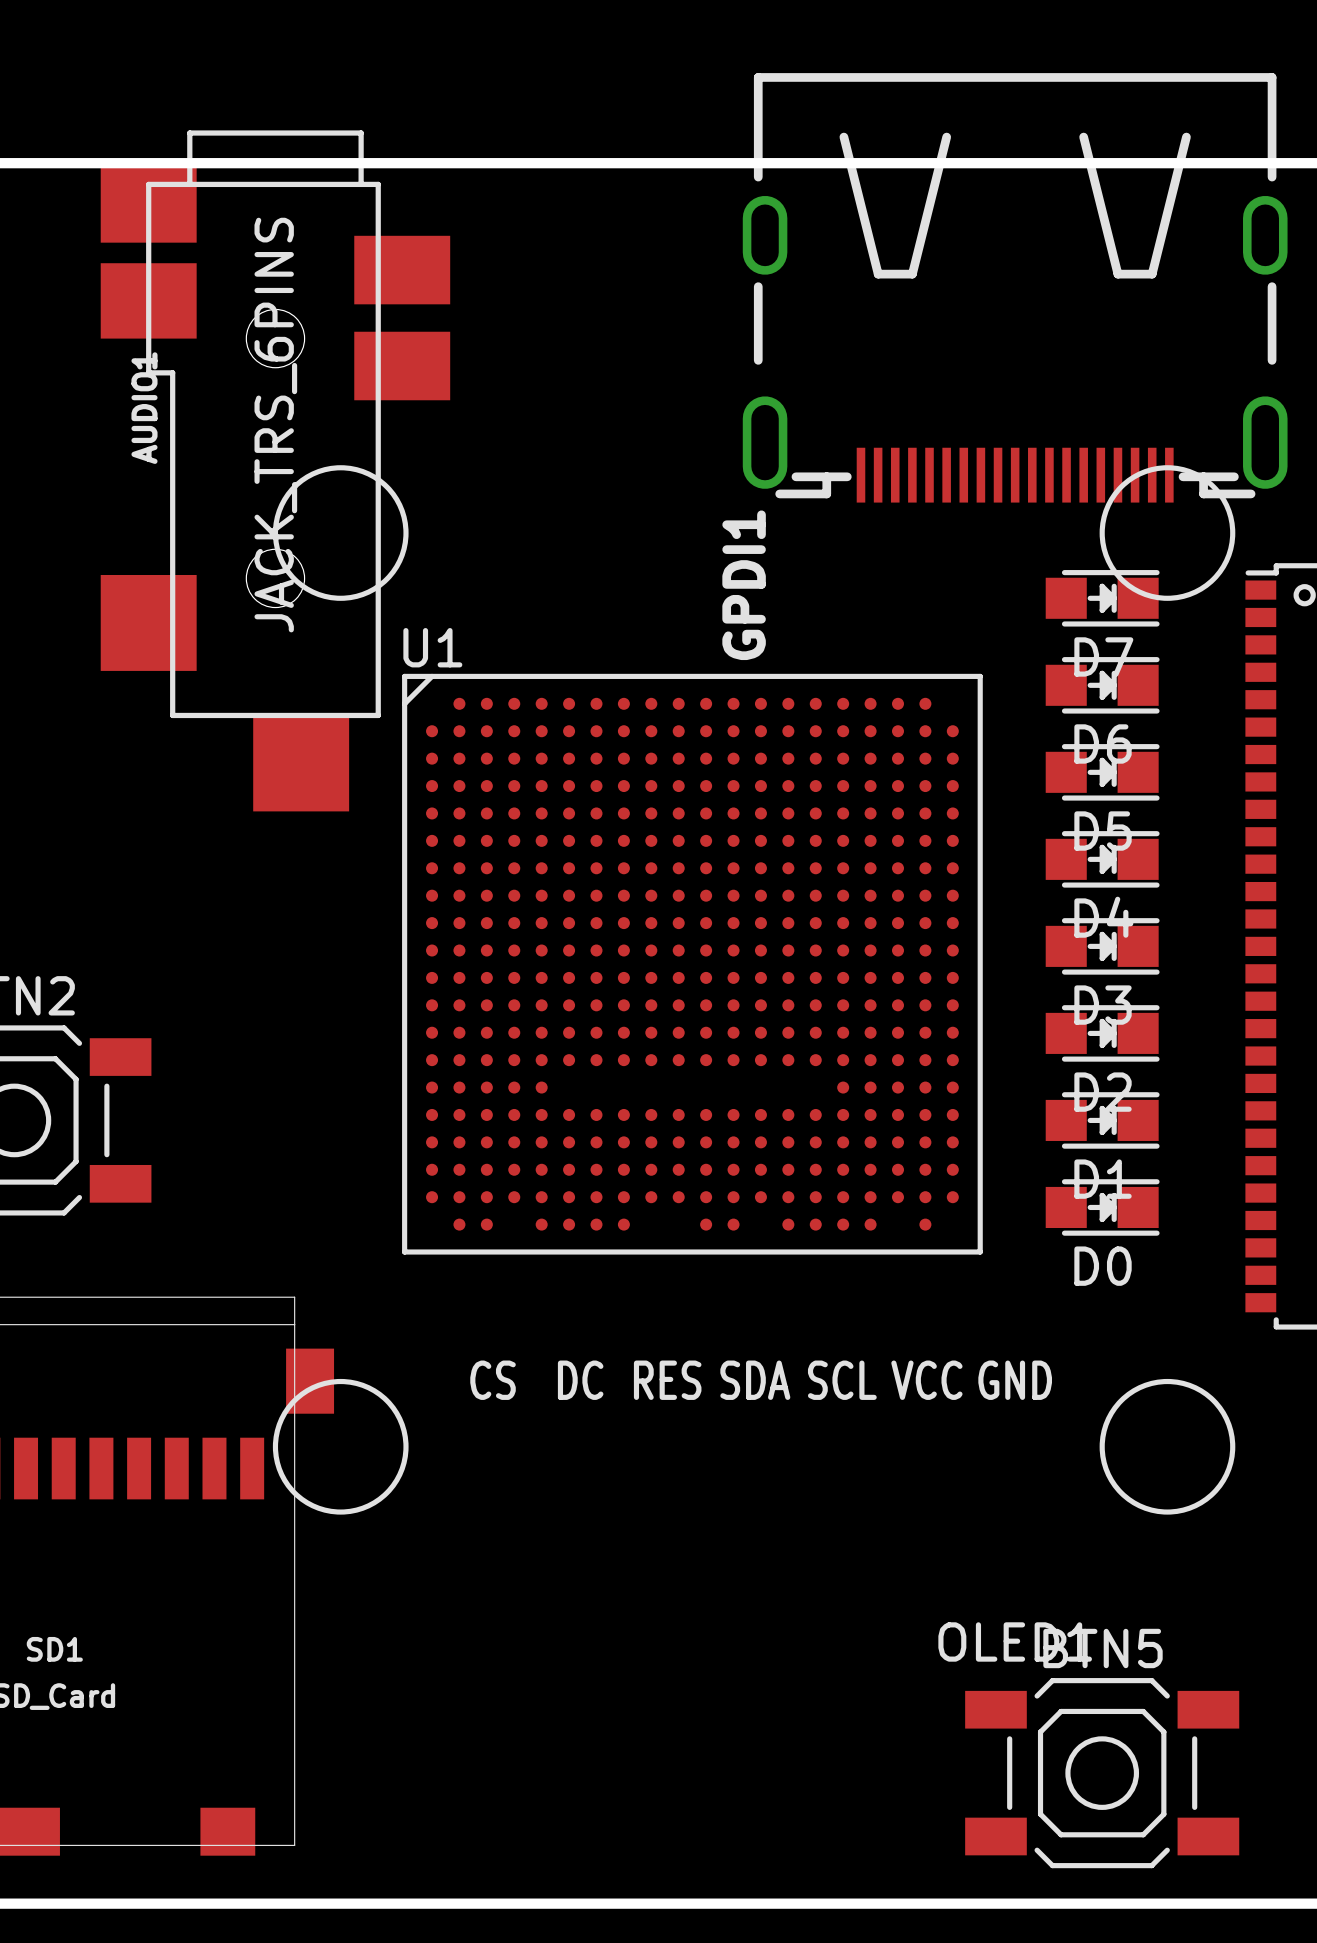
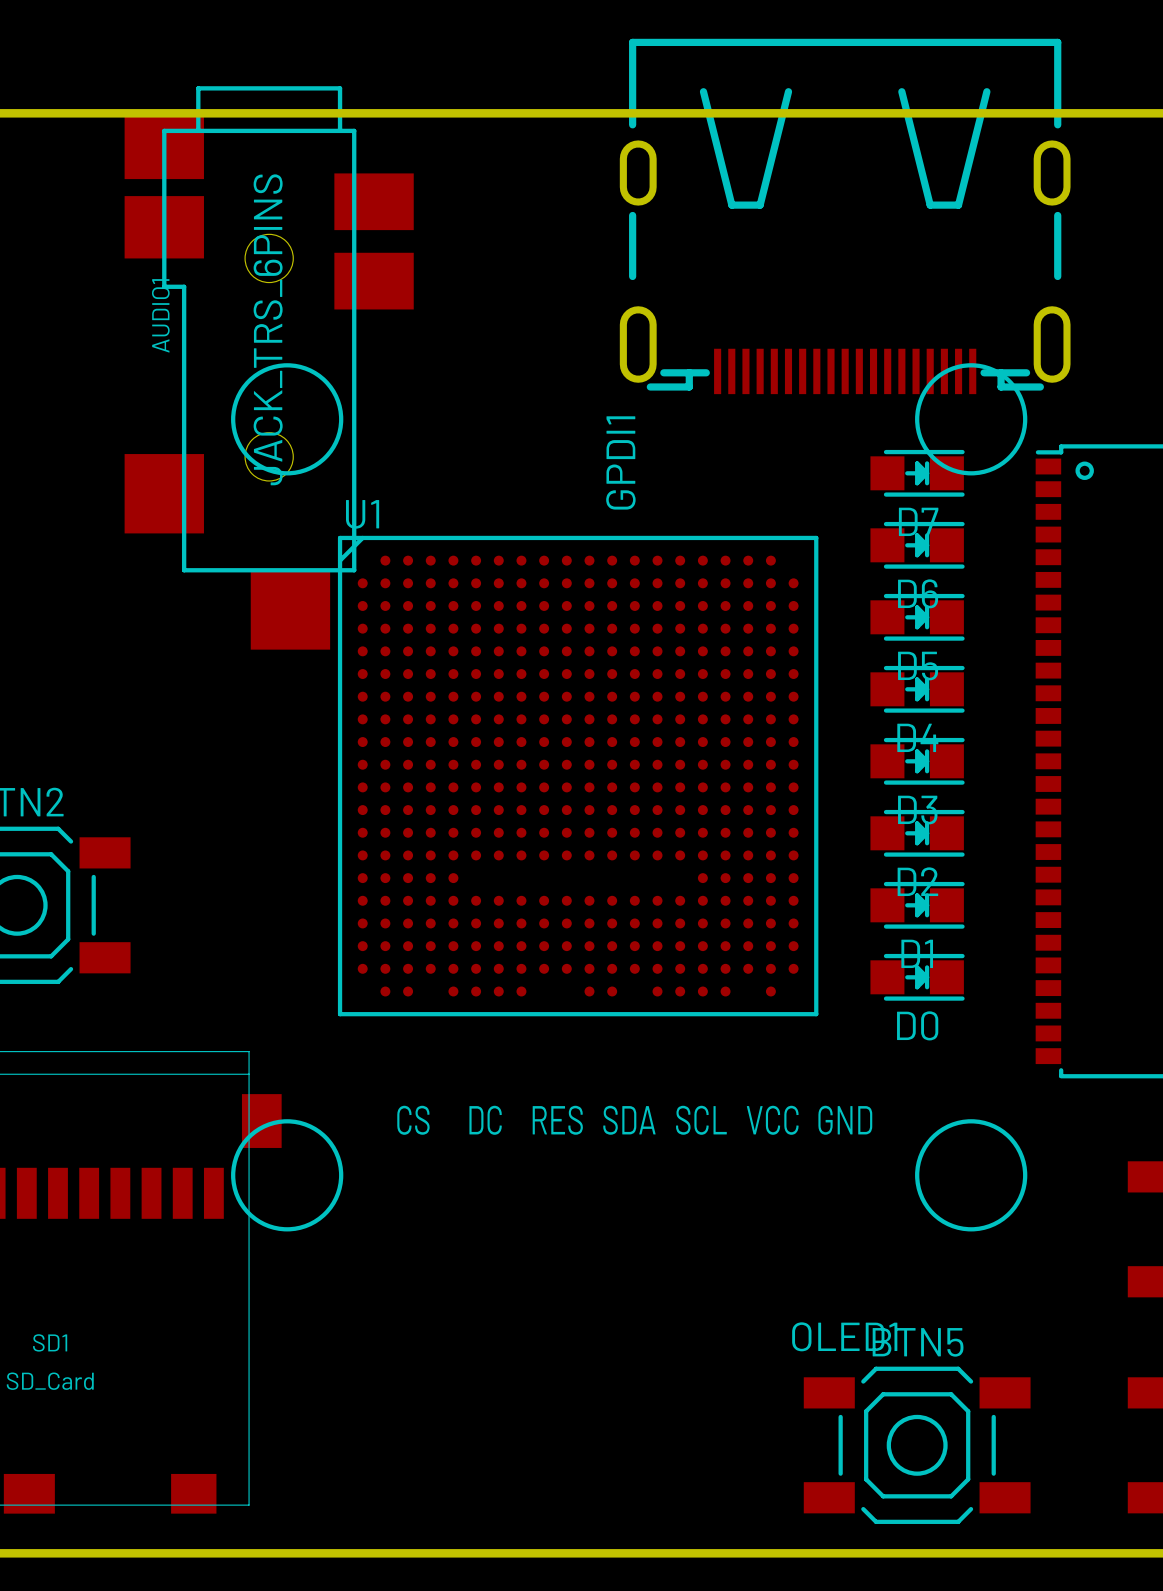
AUDIO1 position: (275, 470) -> (269, 367)

